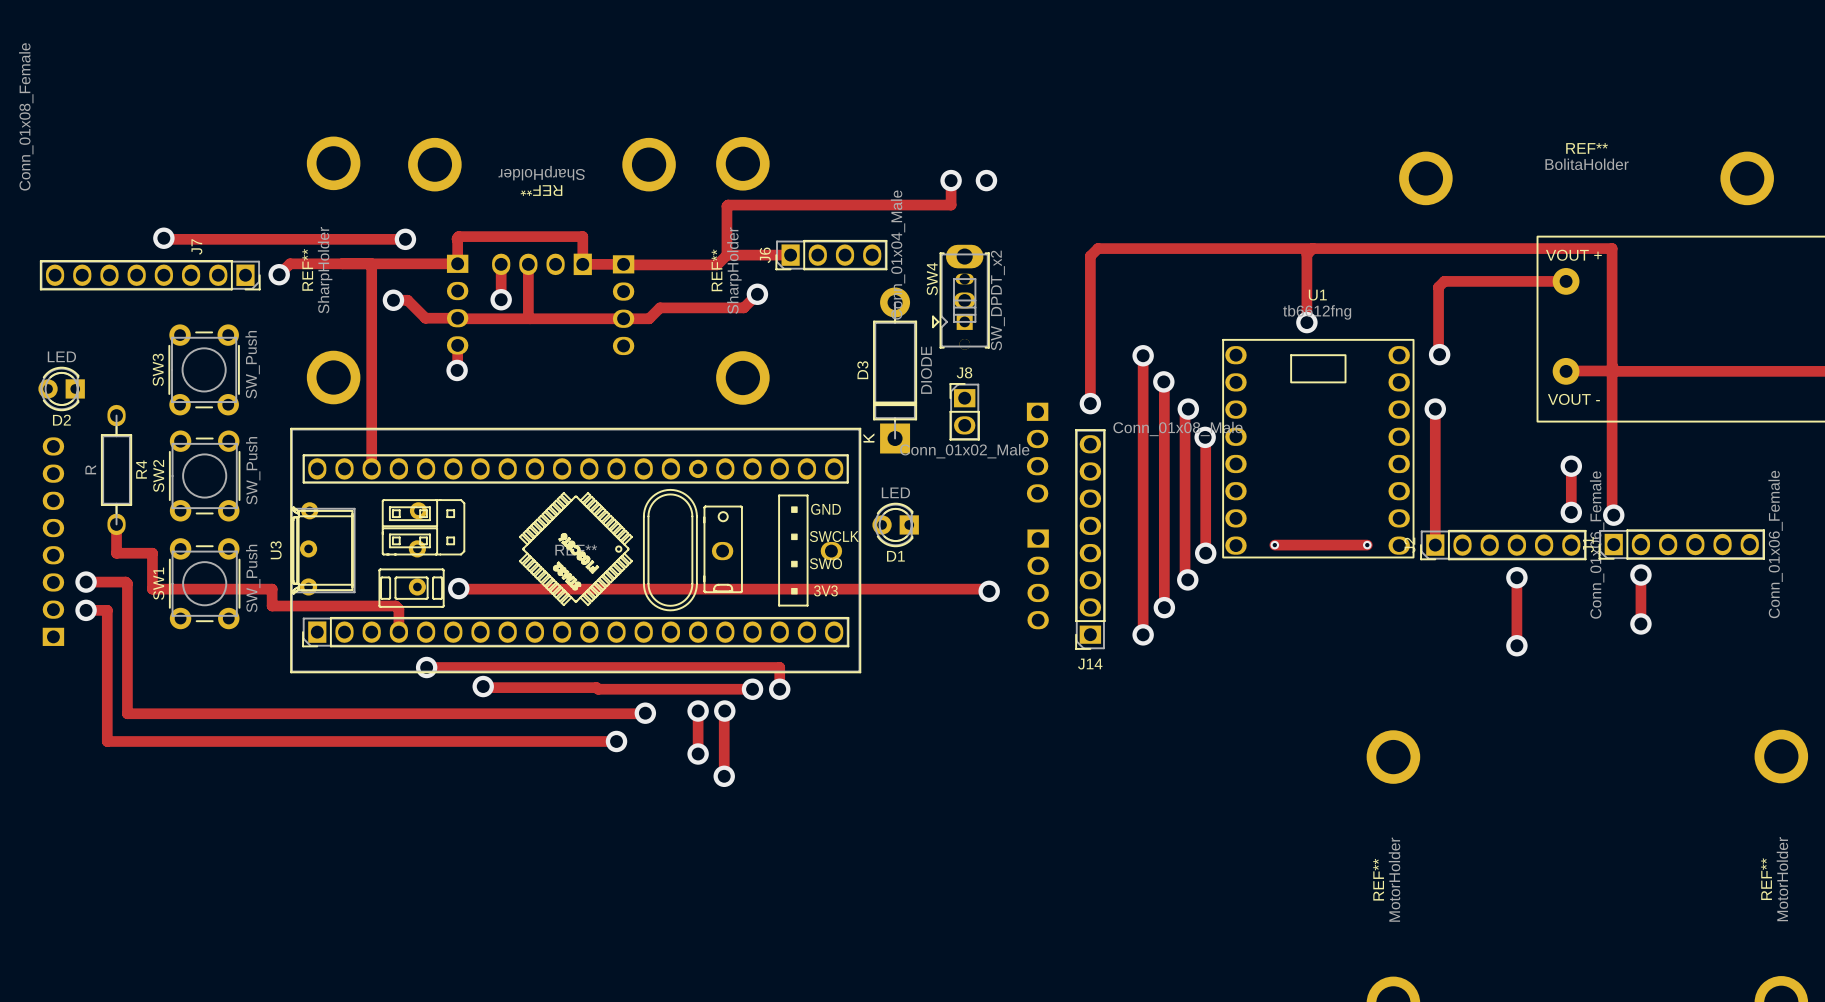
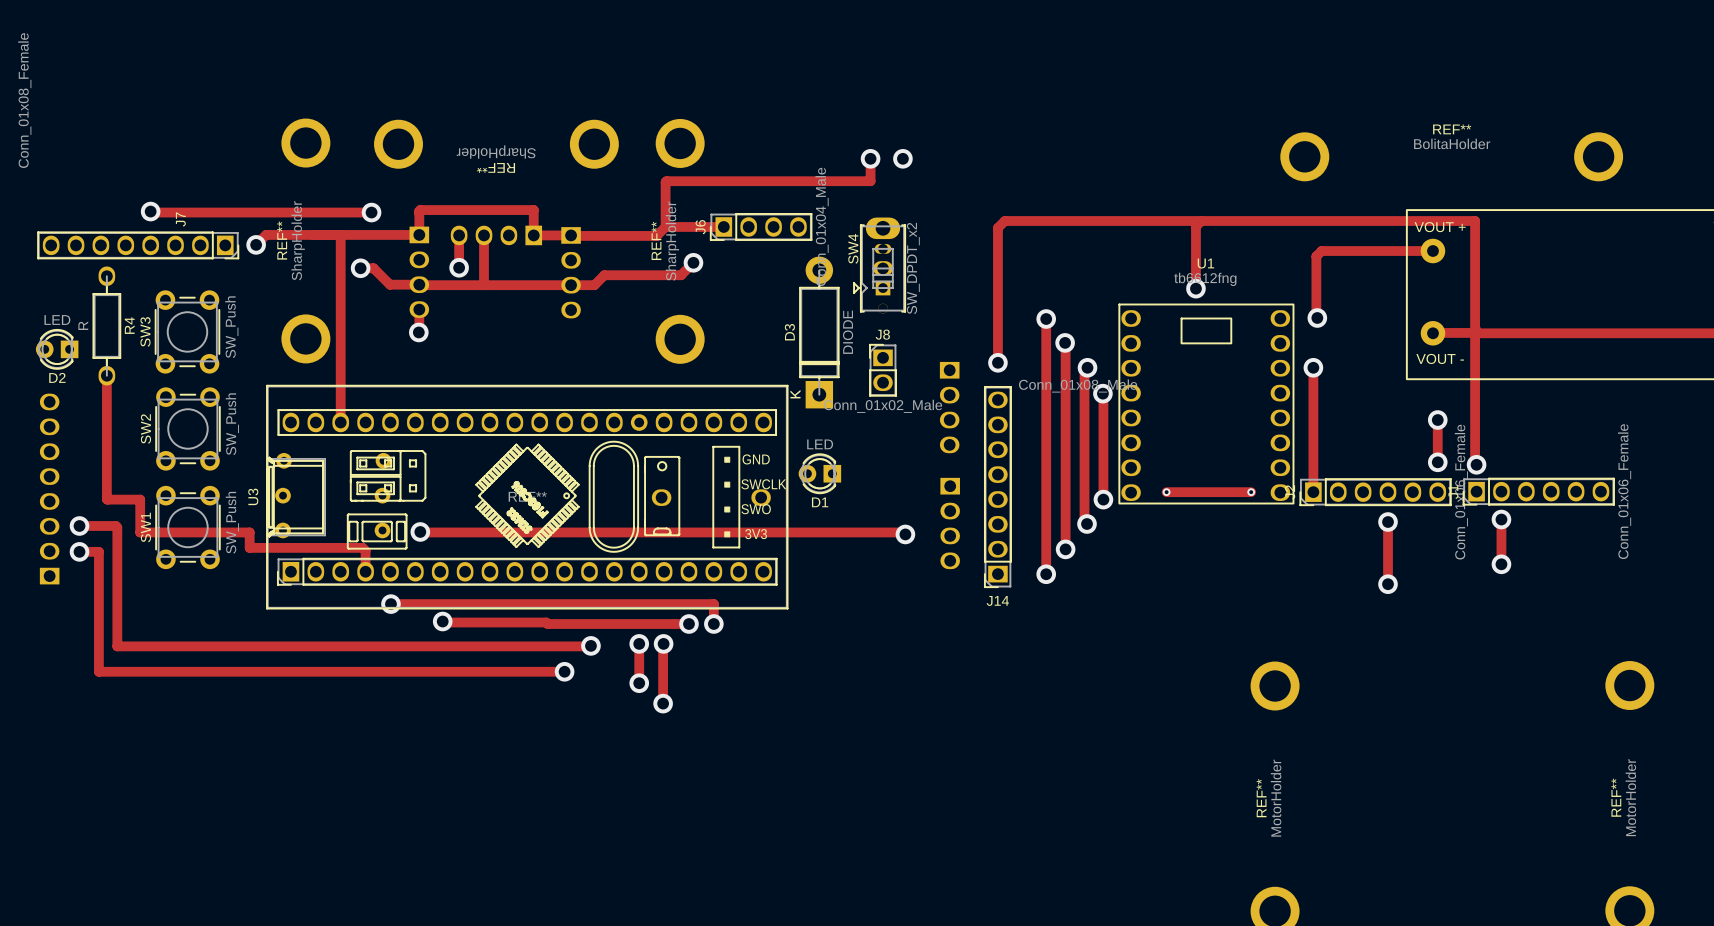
R4 position: (116, 470) -> (106, 325)
track: (116, 524) (116, 553) -> (106, 375) (107, 499)

